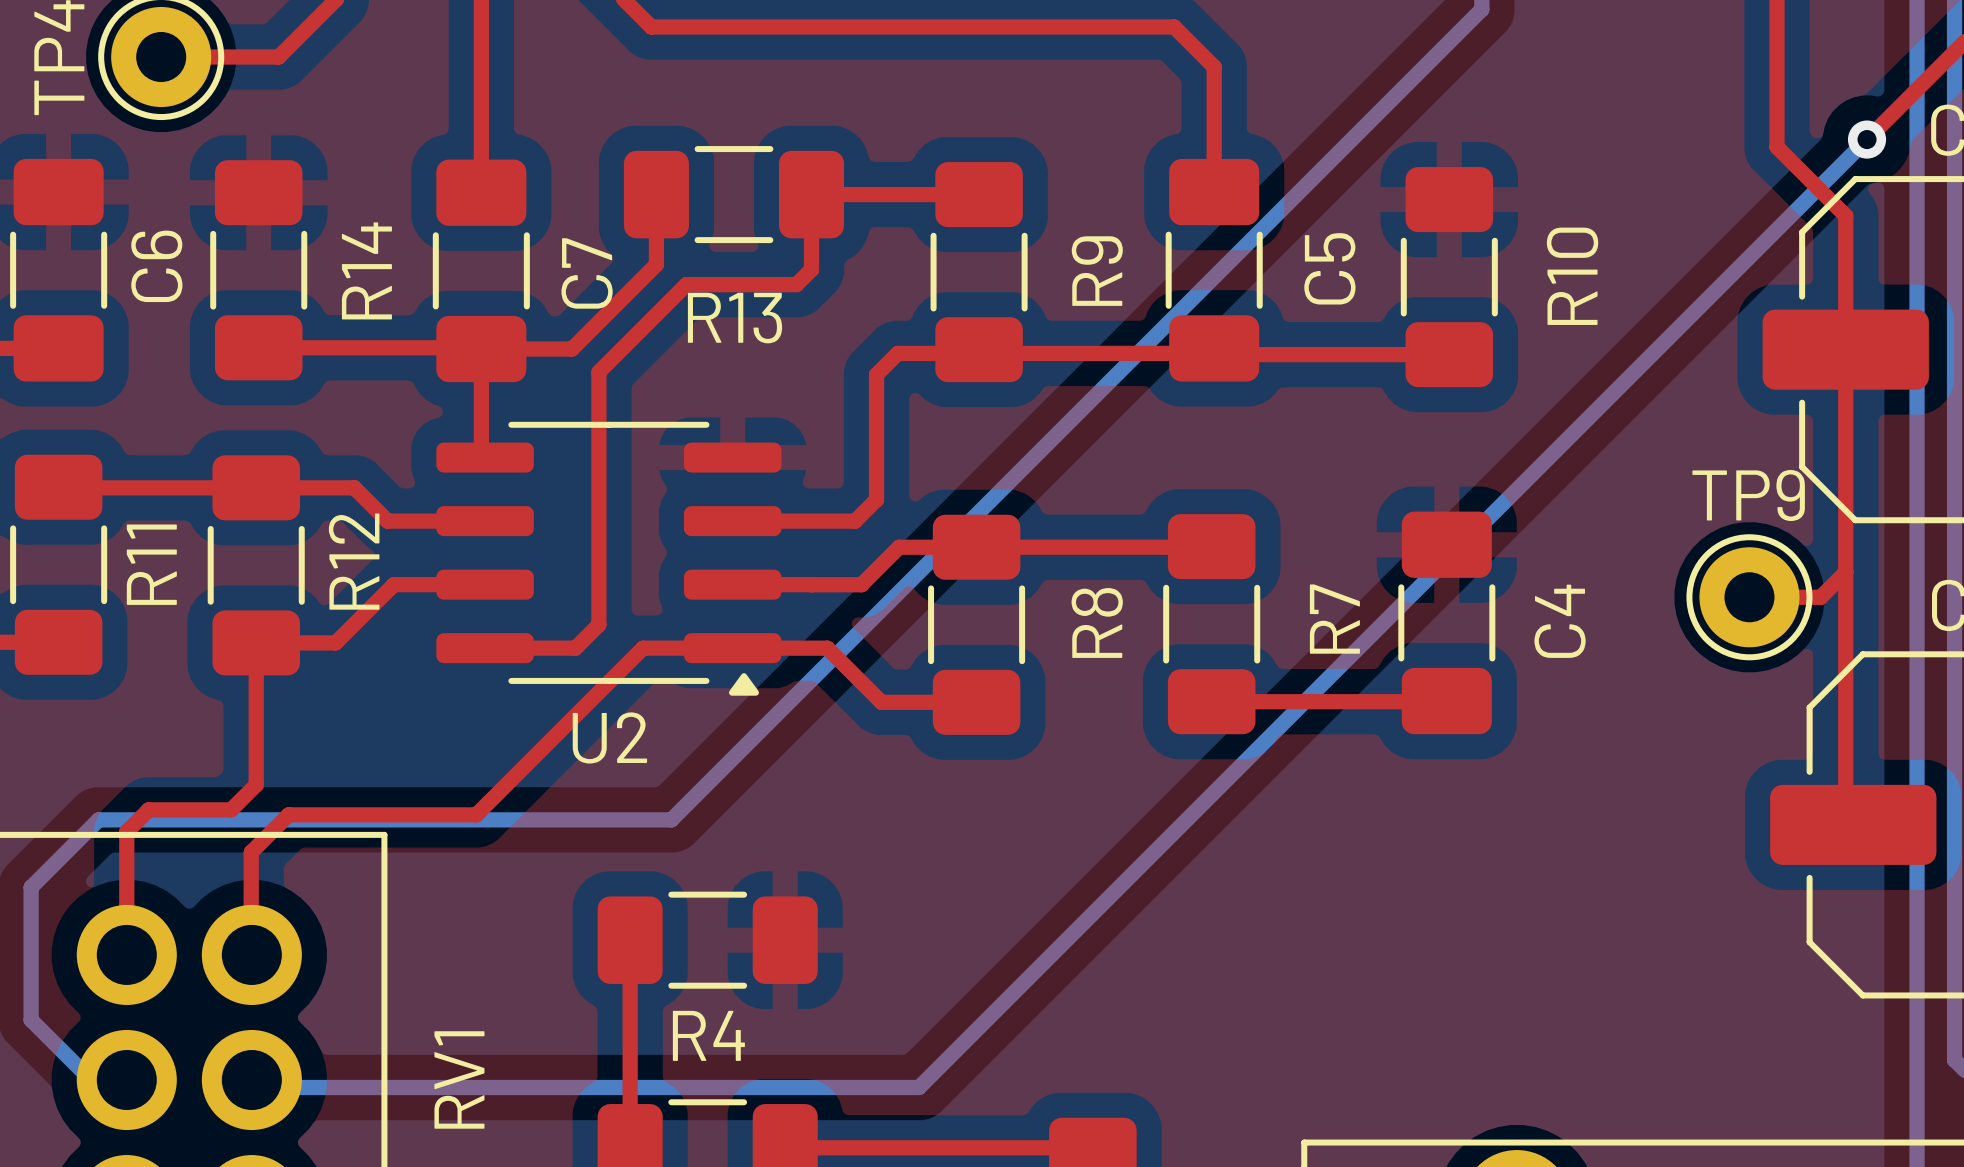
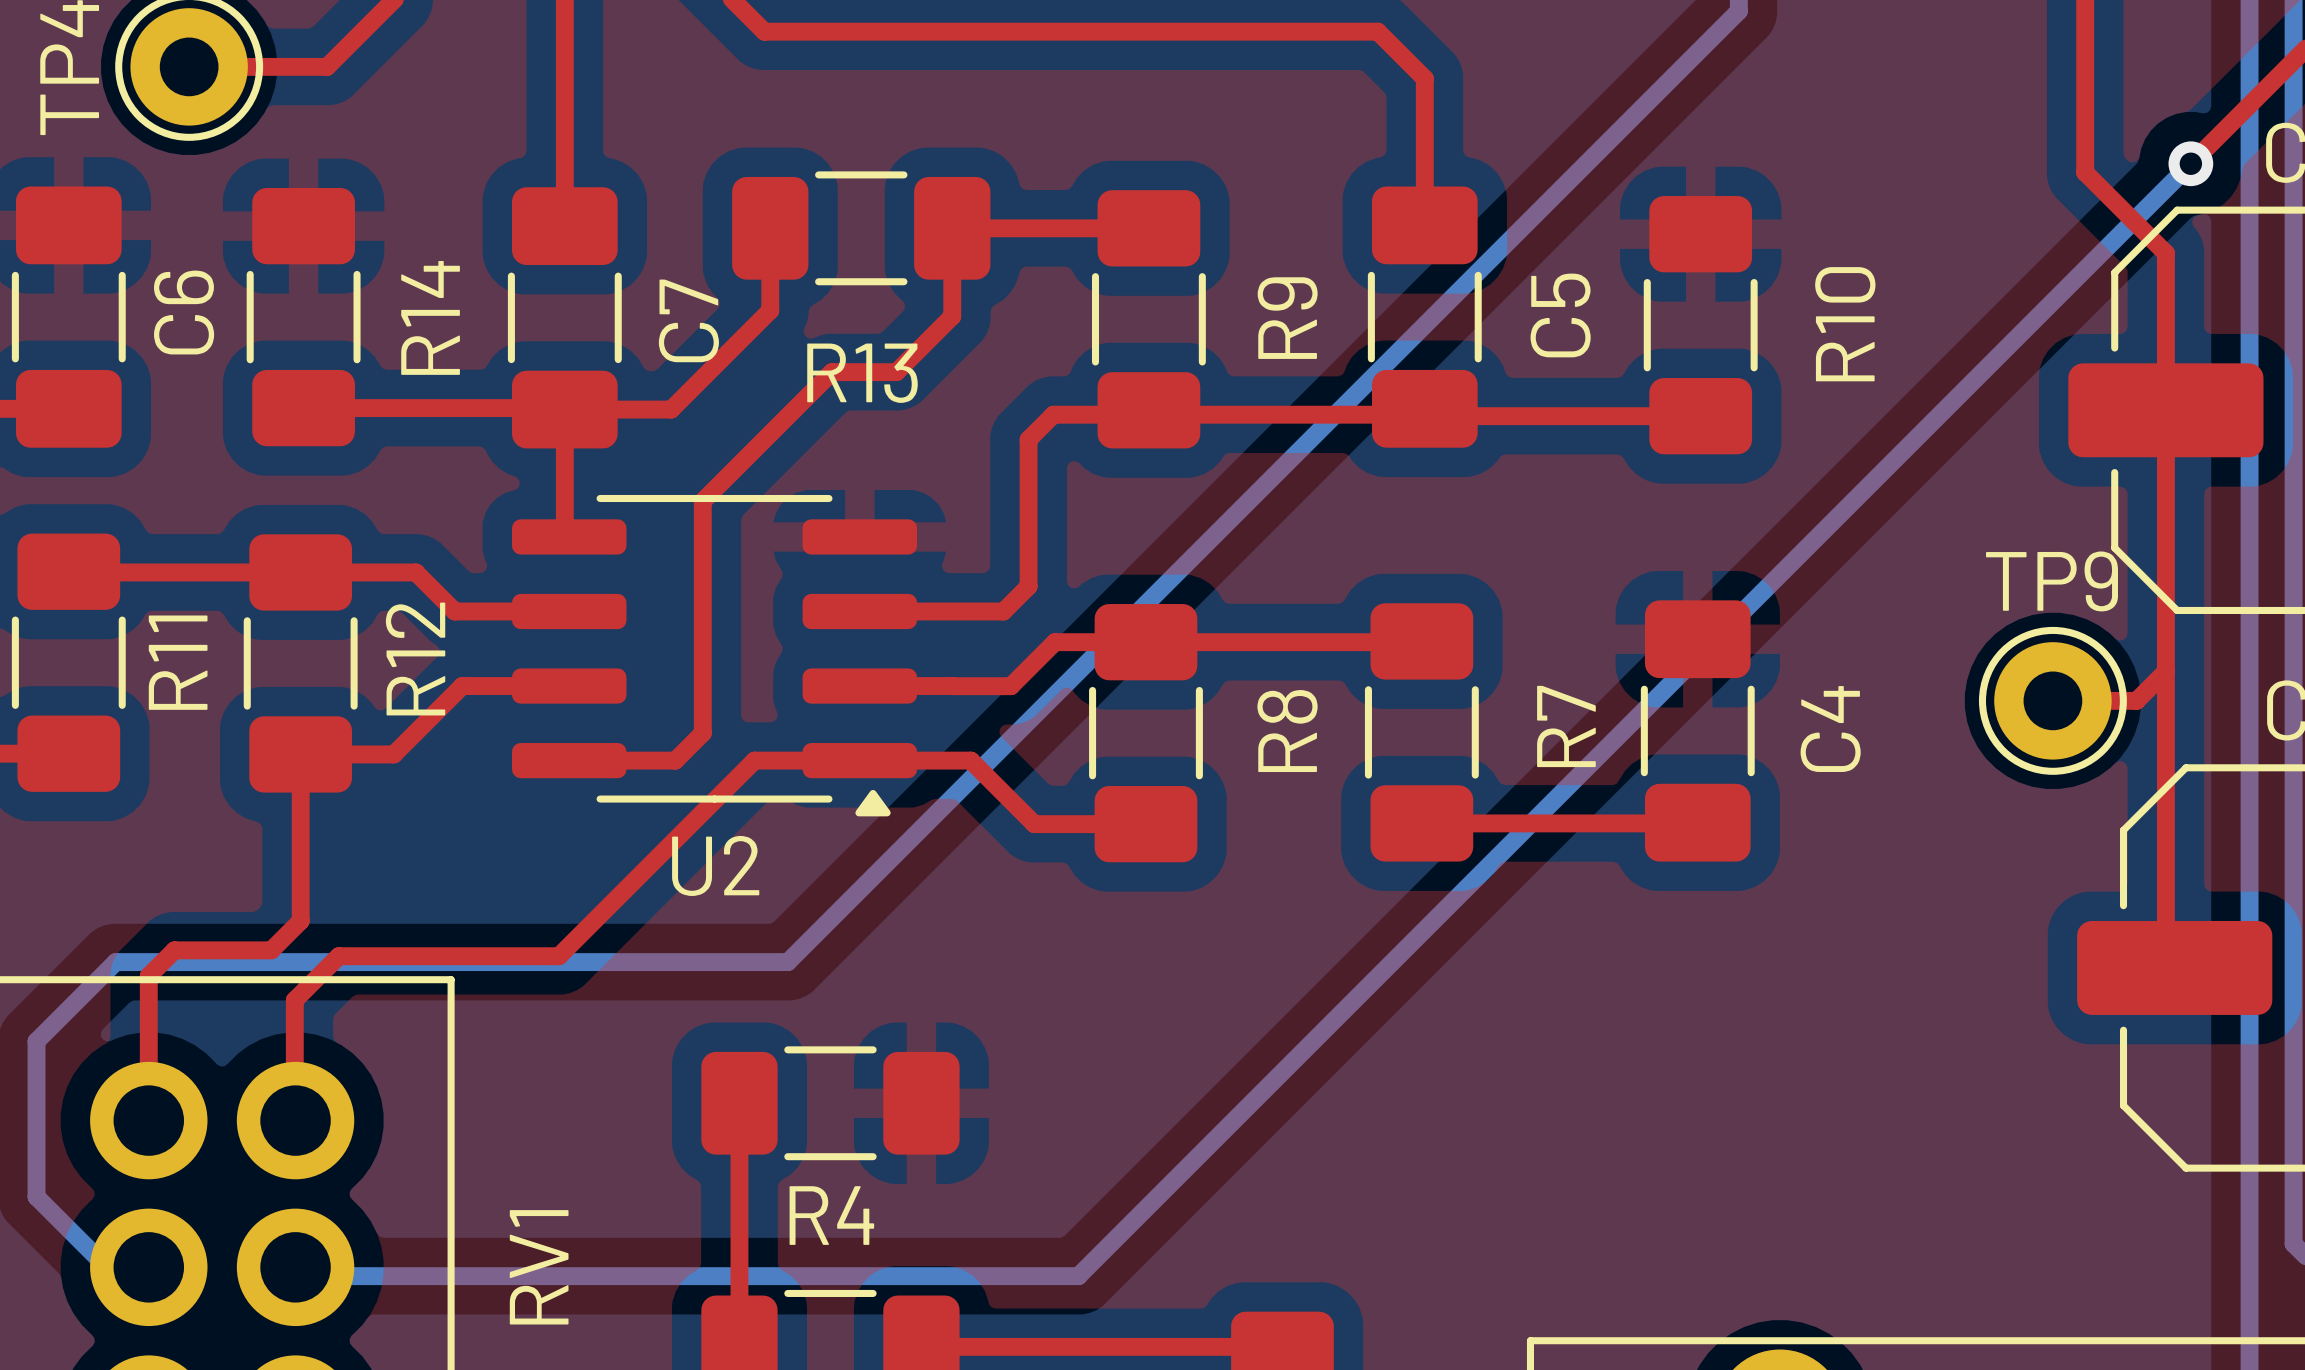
top track: (796, 284) (686, 284) (598, 372) (598, 427) -> (934, 333) (896, 372) (831, 372) (702, 501)

